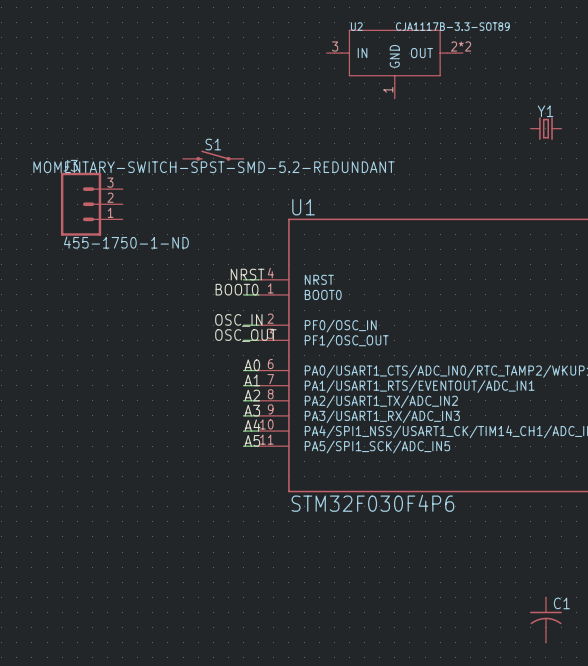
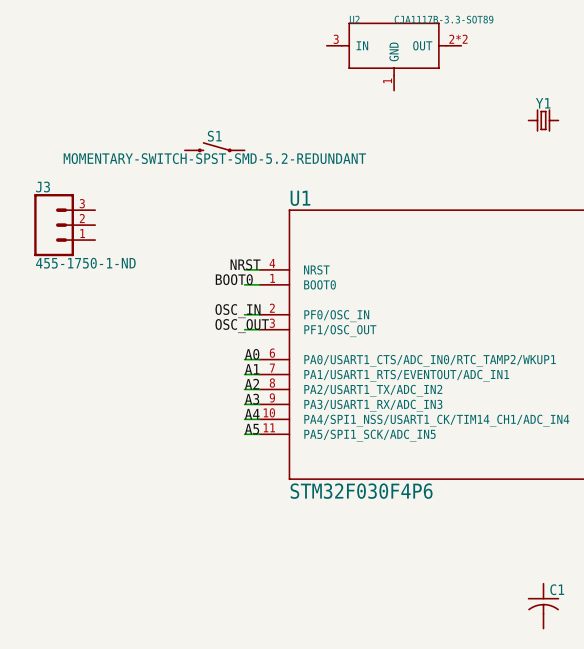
J3 position: (91, 204) -> (64, 225)

